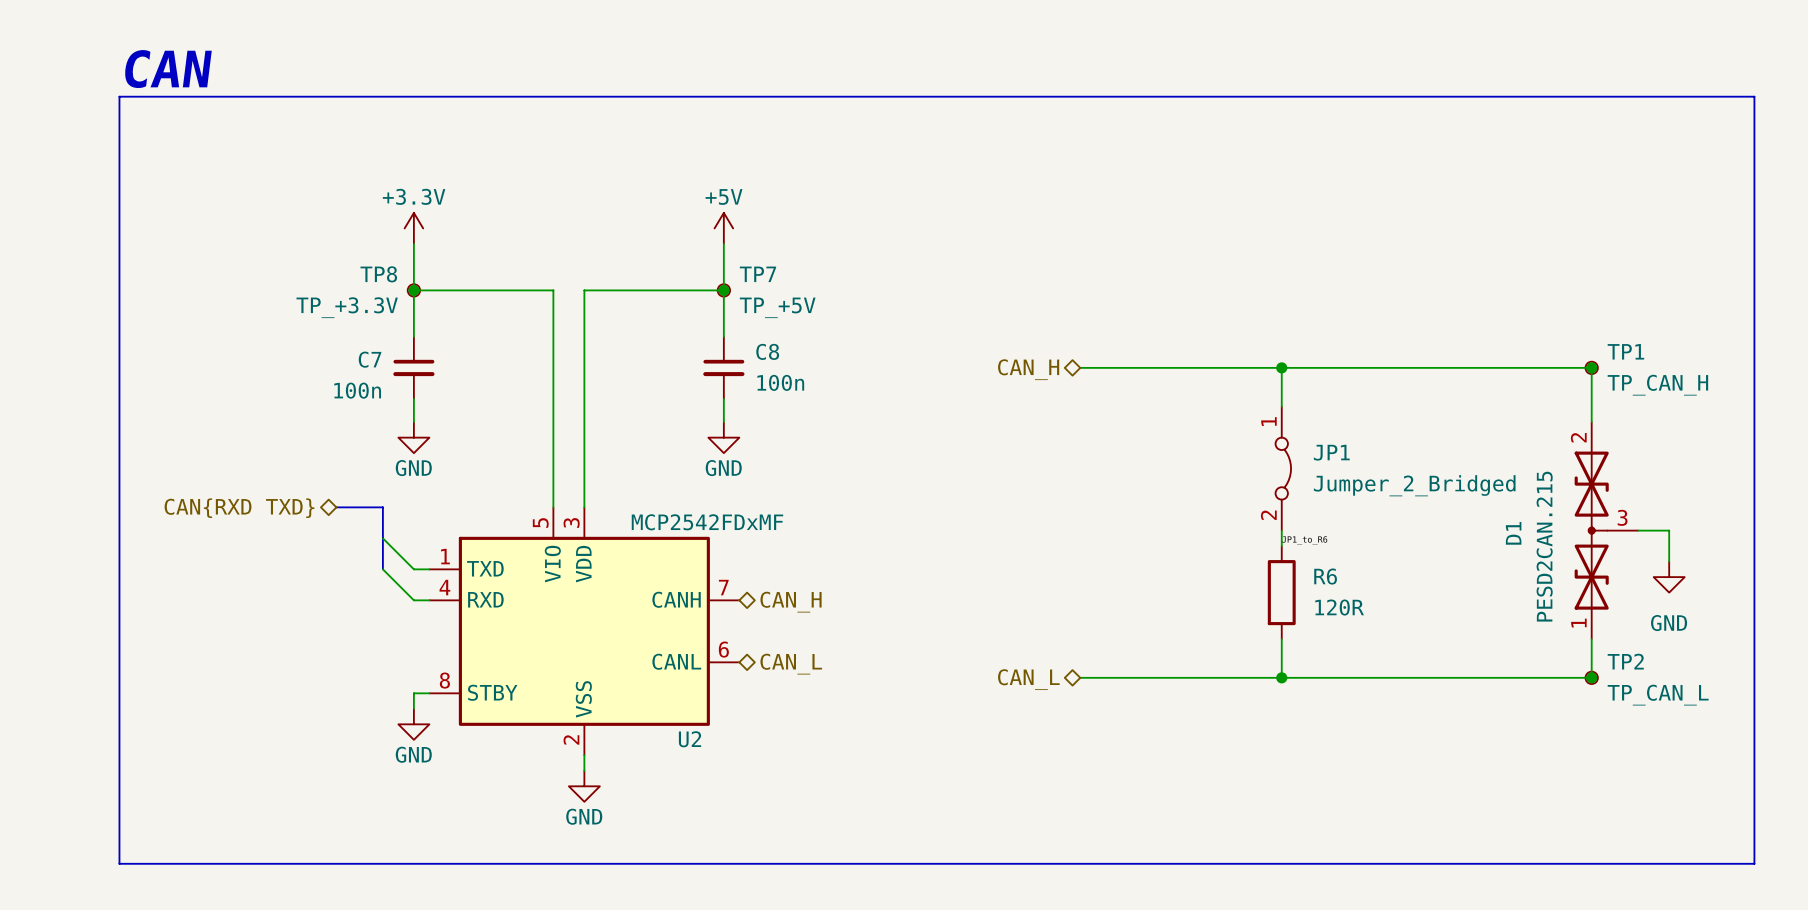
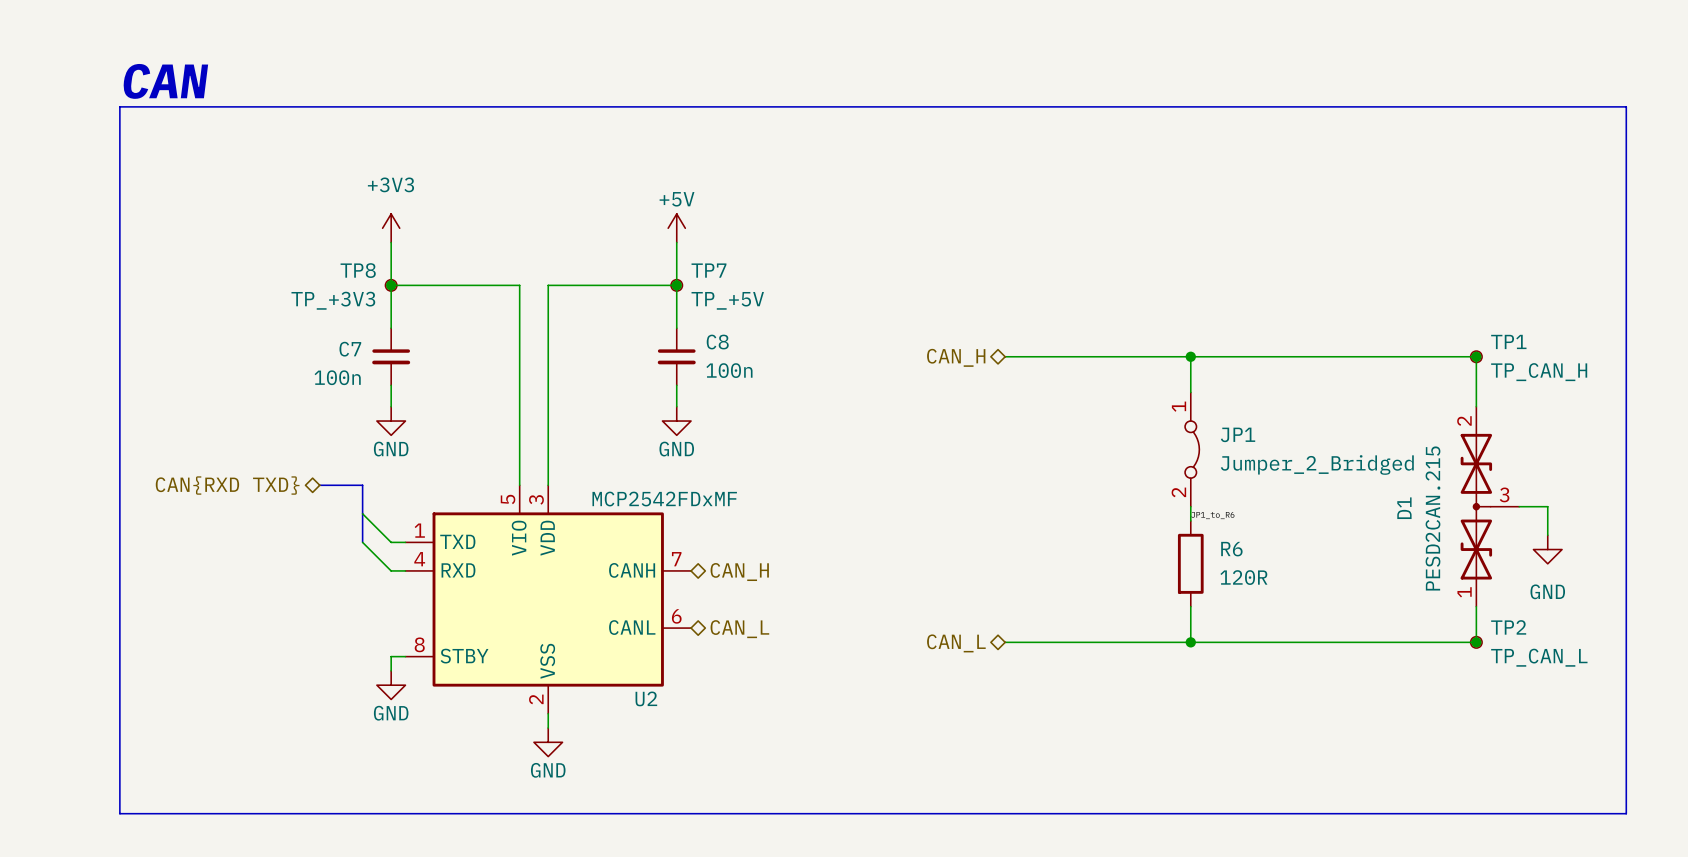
power symbol: +3.3V (413, 228) -> +3V3 (391, 228)
TP8 value: TP_+3.3V (347, 307) -> TP_+3V3 (333, 300)

